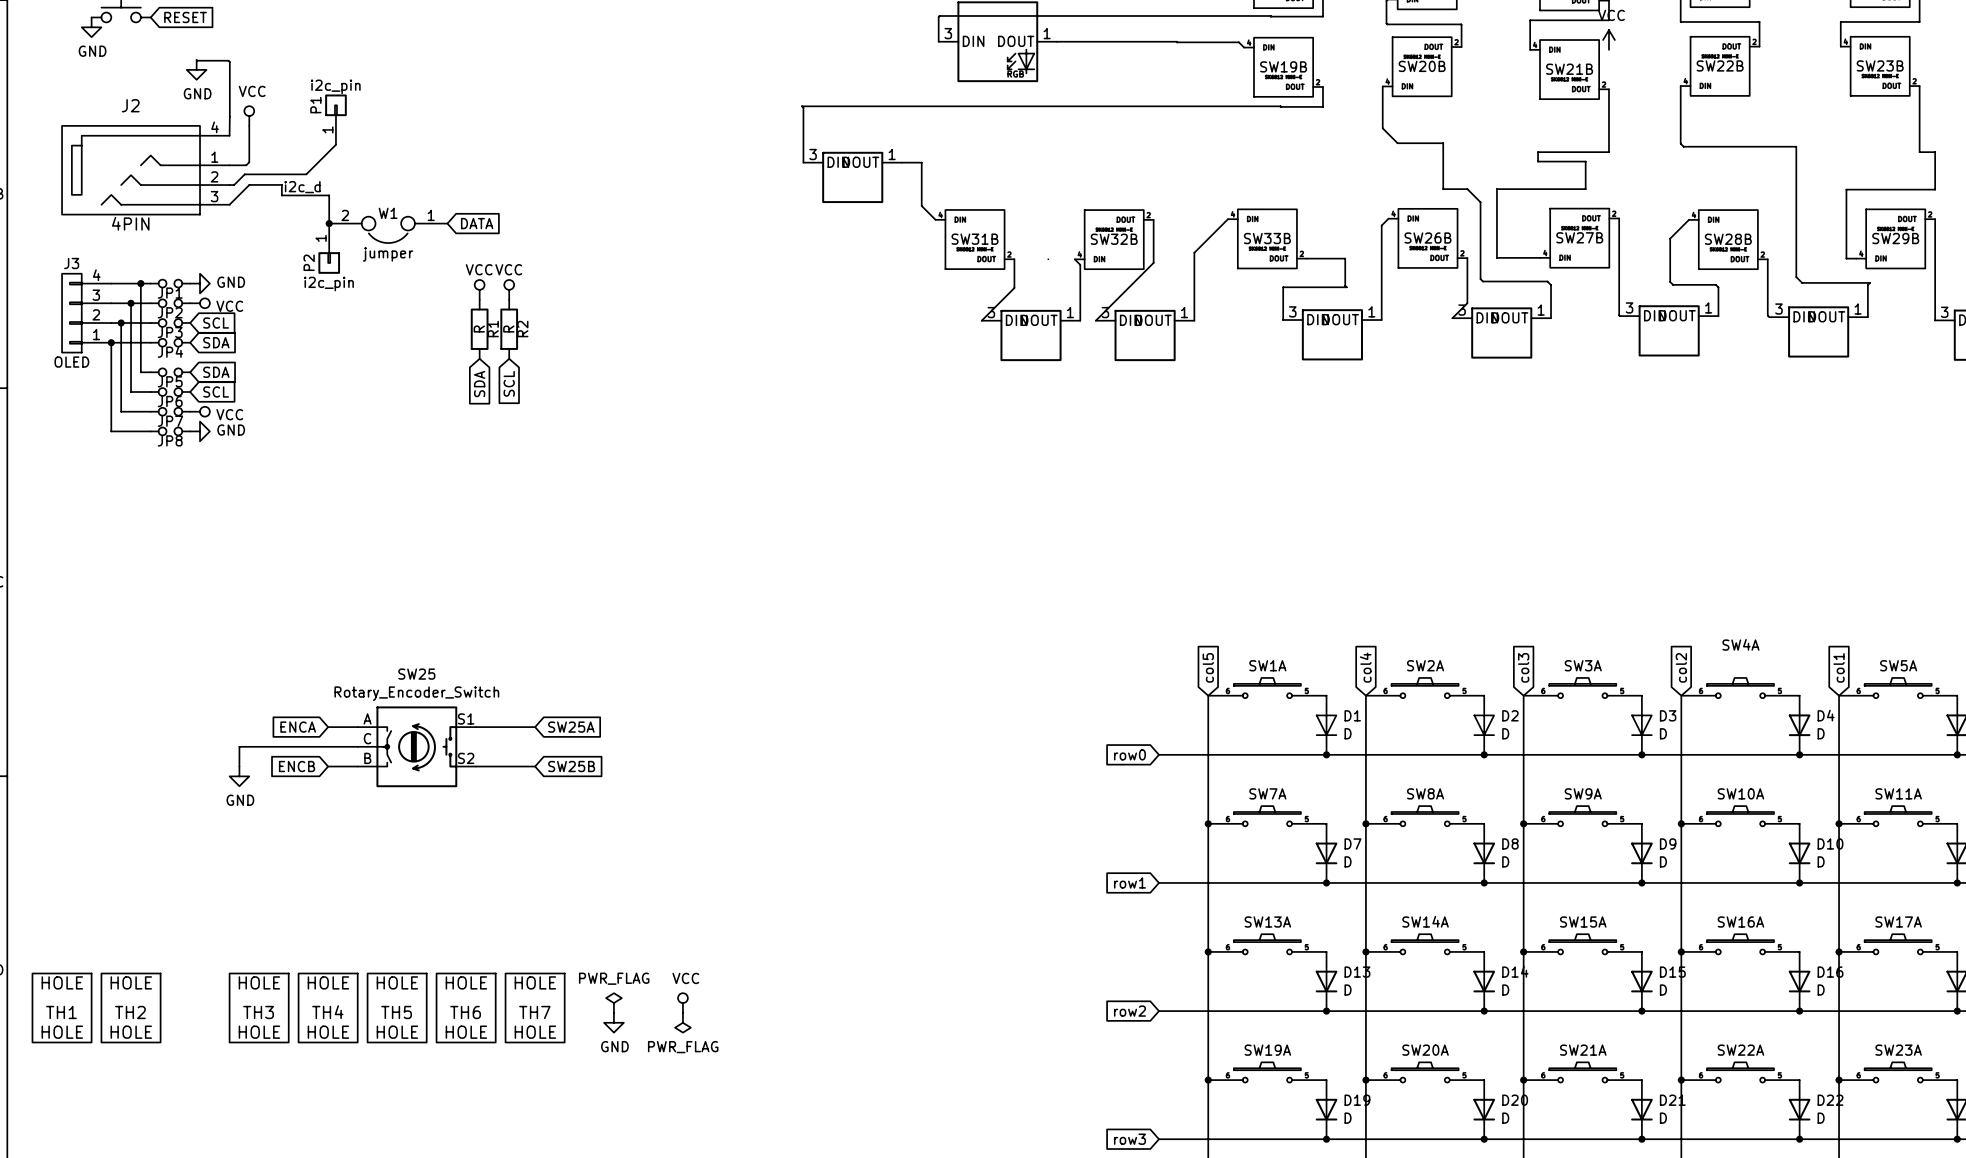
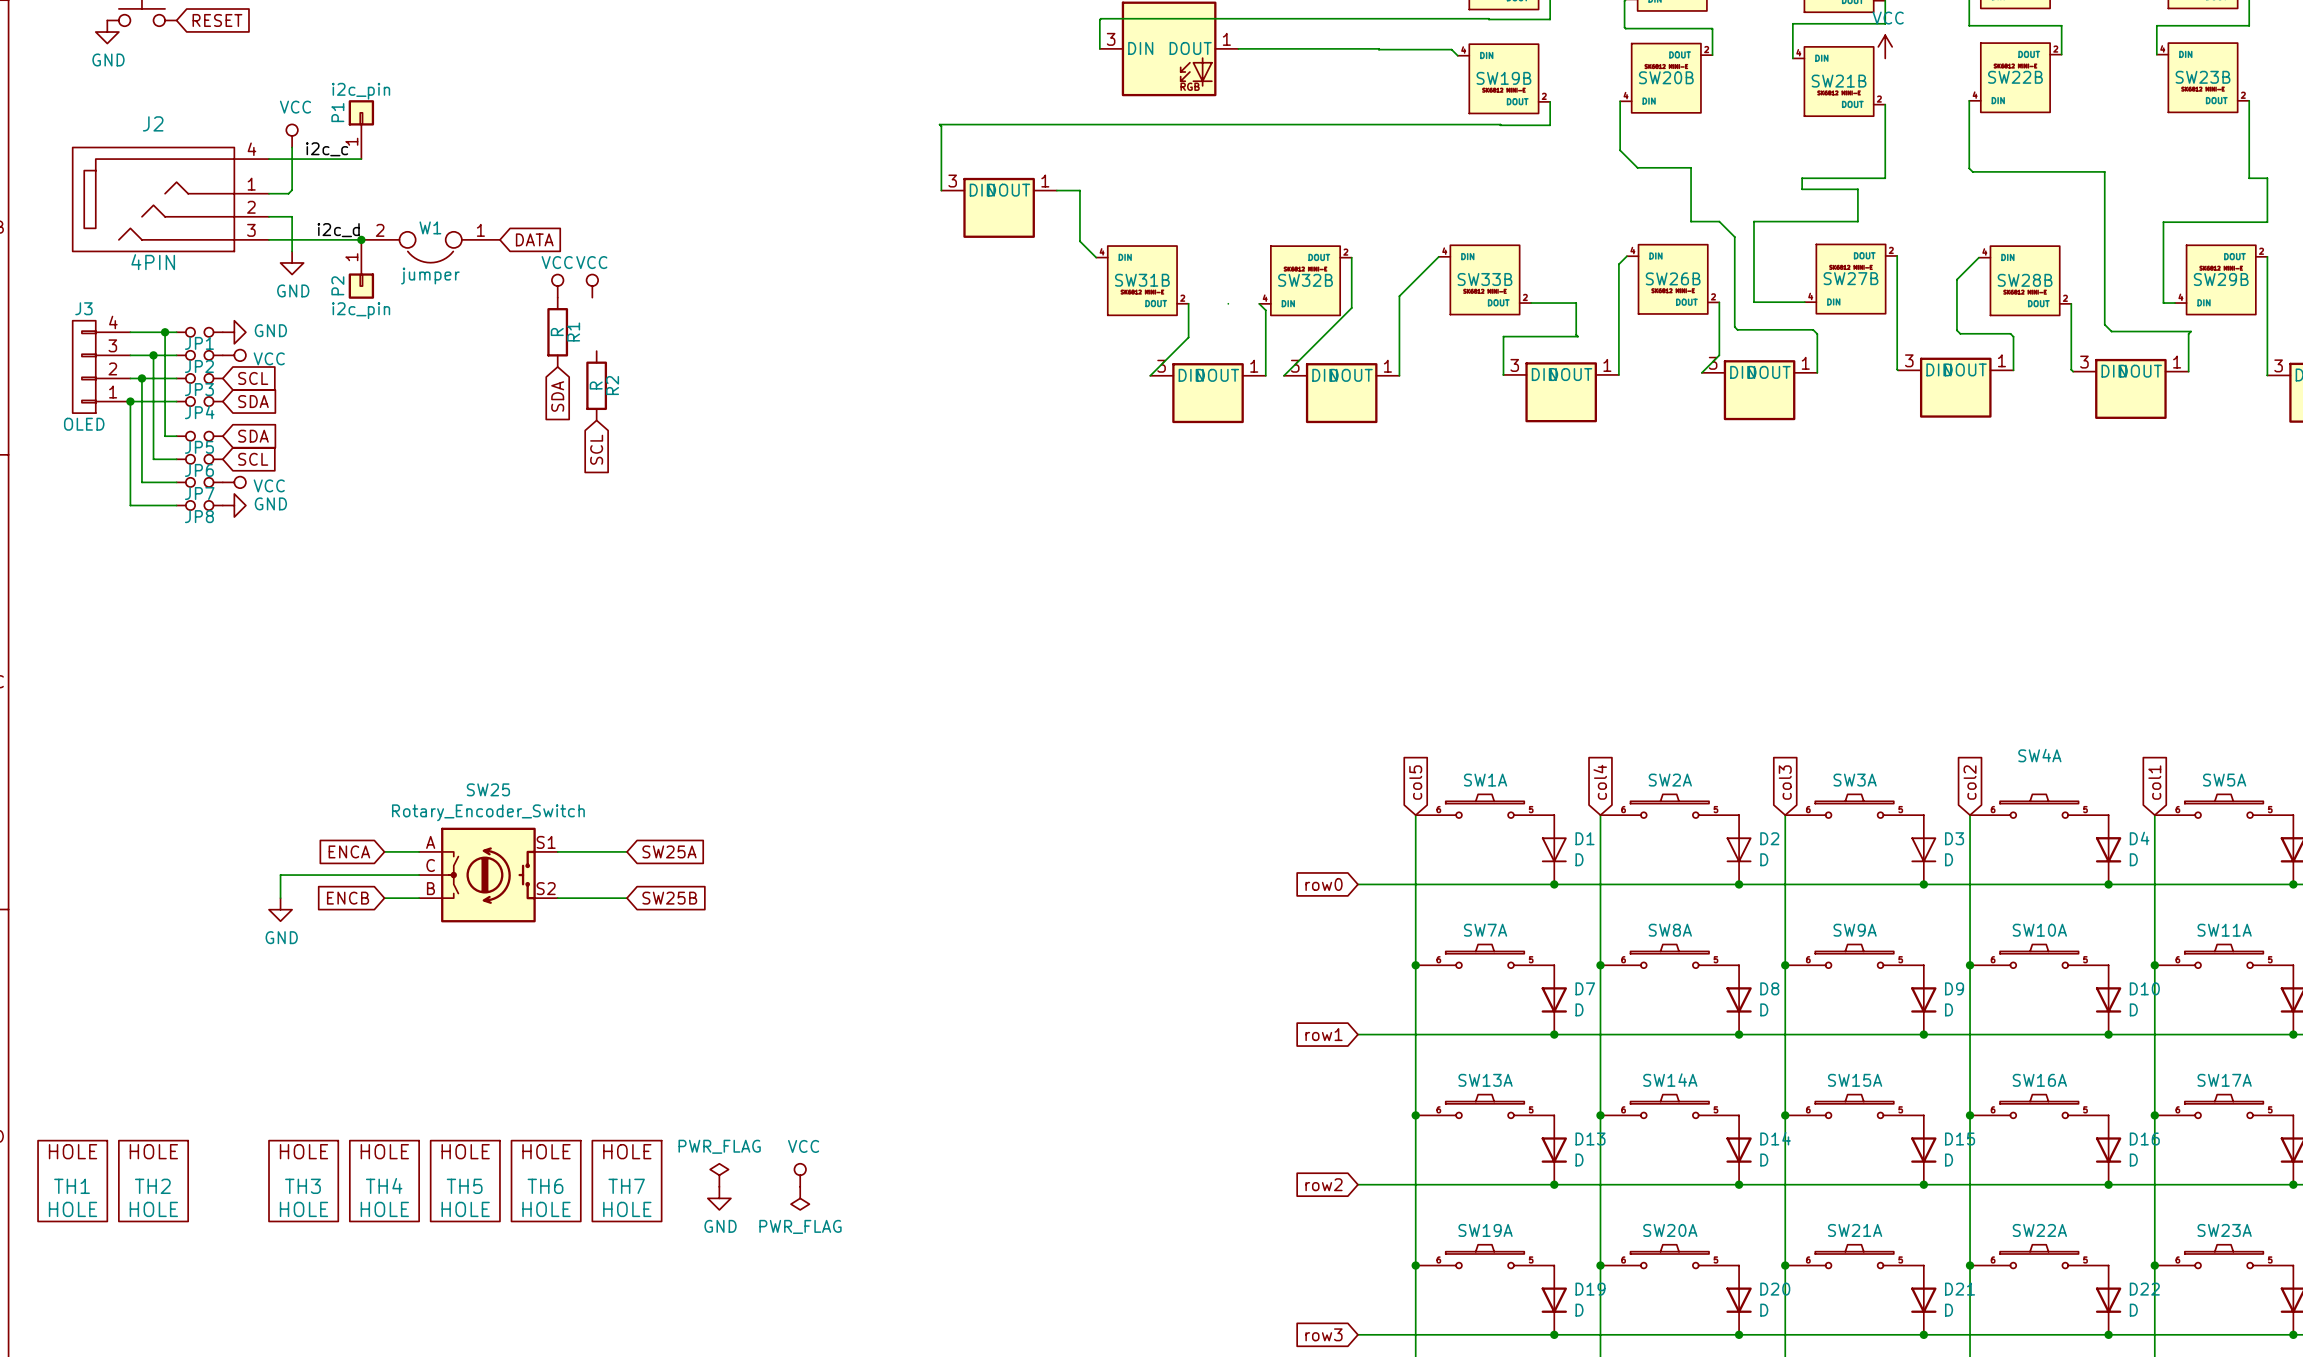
wire: (196, 60) (229, 62) (229, 135) -> (361, 159) (269, 159)
power symbol position: GND (196, 69) -> GND (292, 262)
P1 position: (335, 119) -> (361, 129)
label: none -> i2c_c (327, 149)
wire: (335, 144) (306, 174) (244, 174) (234, 185) -> (292, 251) (292, 216) (274, 216)
label position: i2c_d (302, 187) -> i2c_d (338, 230)
wire: (229, 204) (249, 184) (281, 184) (281, 195) (329, 195) (329, 223) -> (269, 239) (361, 239)
junction position: (329, 223) -> (361, 239)
global label position: DATA (477, 223) -> DATA (534, 239)
W1 position: (388, 229) -> (430, 247)
power symbol: none -> VCC (557, 286)
power symbol: none -> VCC (592, 286)
P2 position: (329, 248) -> (361, 269)
power symbol: VCC (479, 289) -> none
power symbol: VCC (509, 289) -> none
R1 position: (479, 329) -> (557, 332)
global label position: SDA (479, 384) -> SDA (557, 396)

